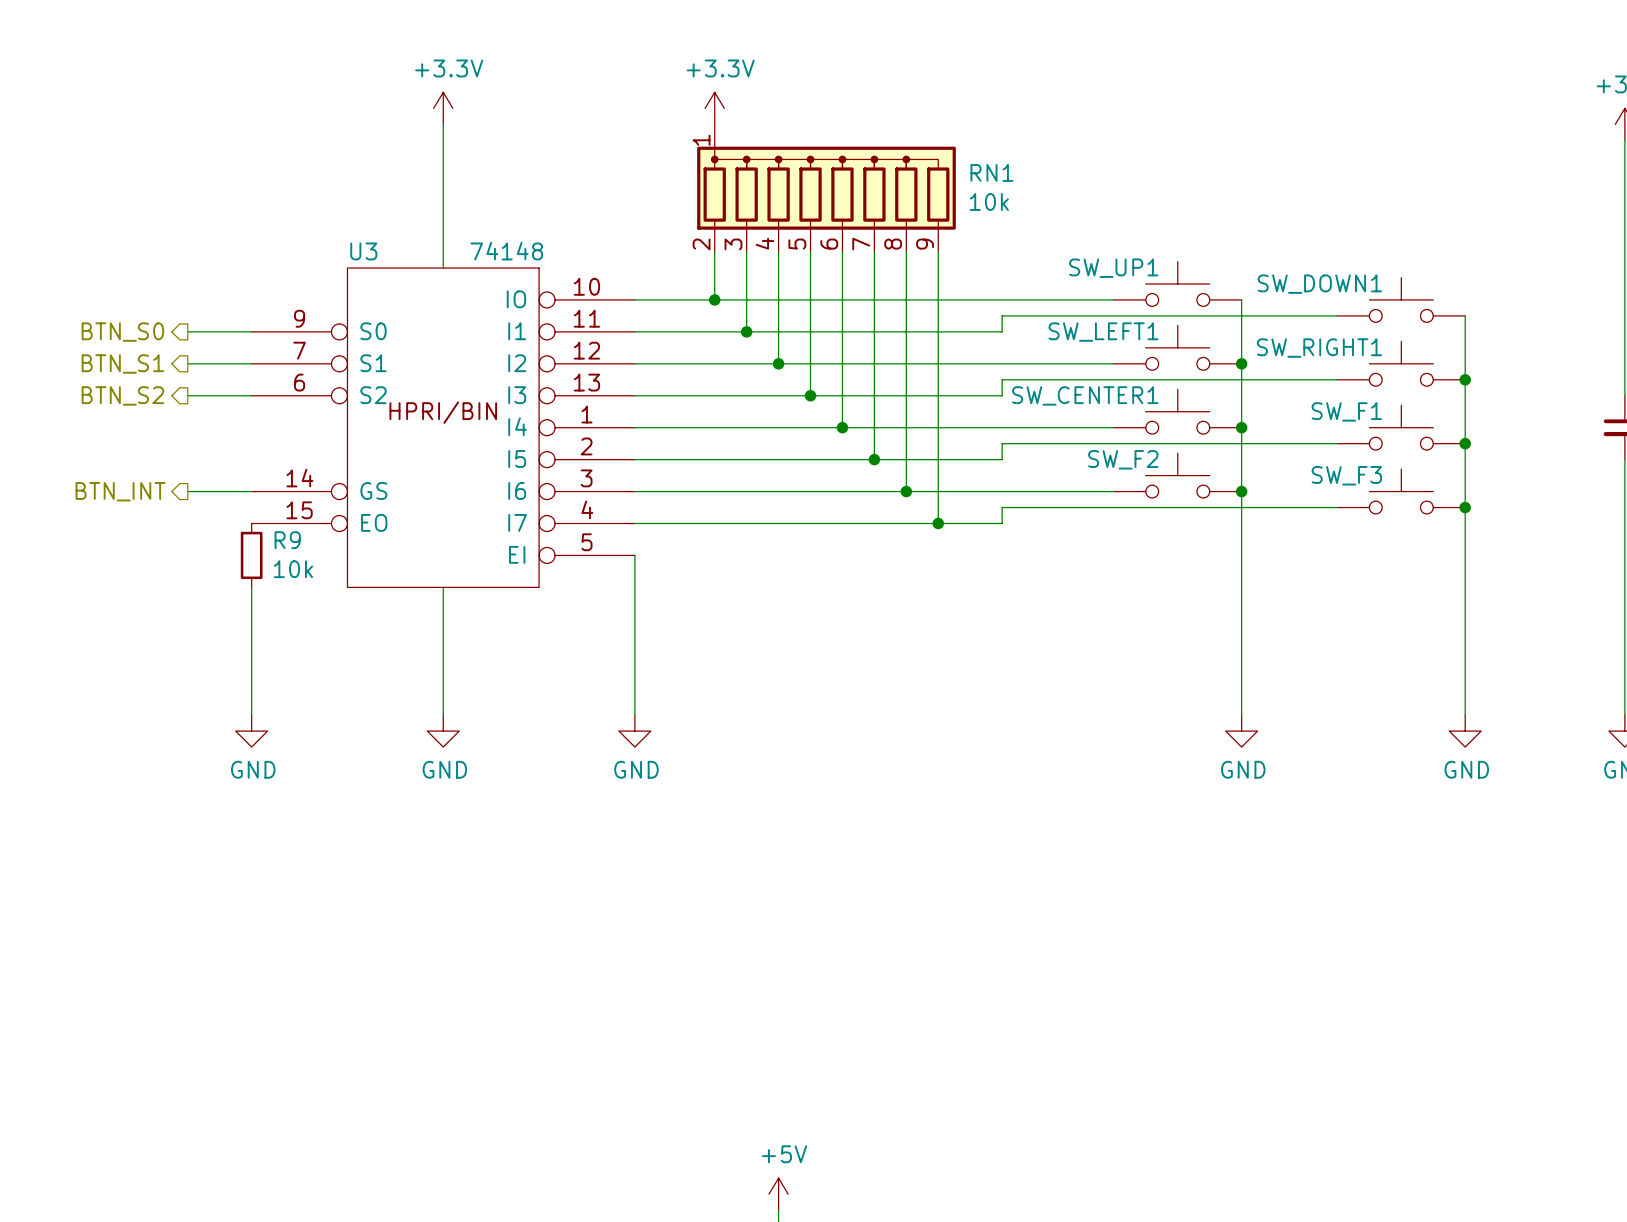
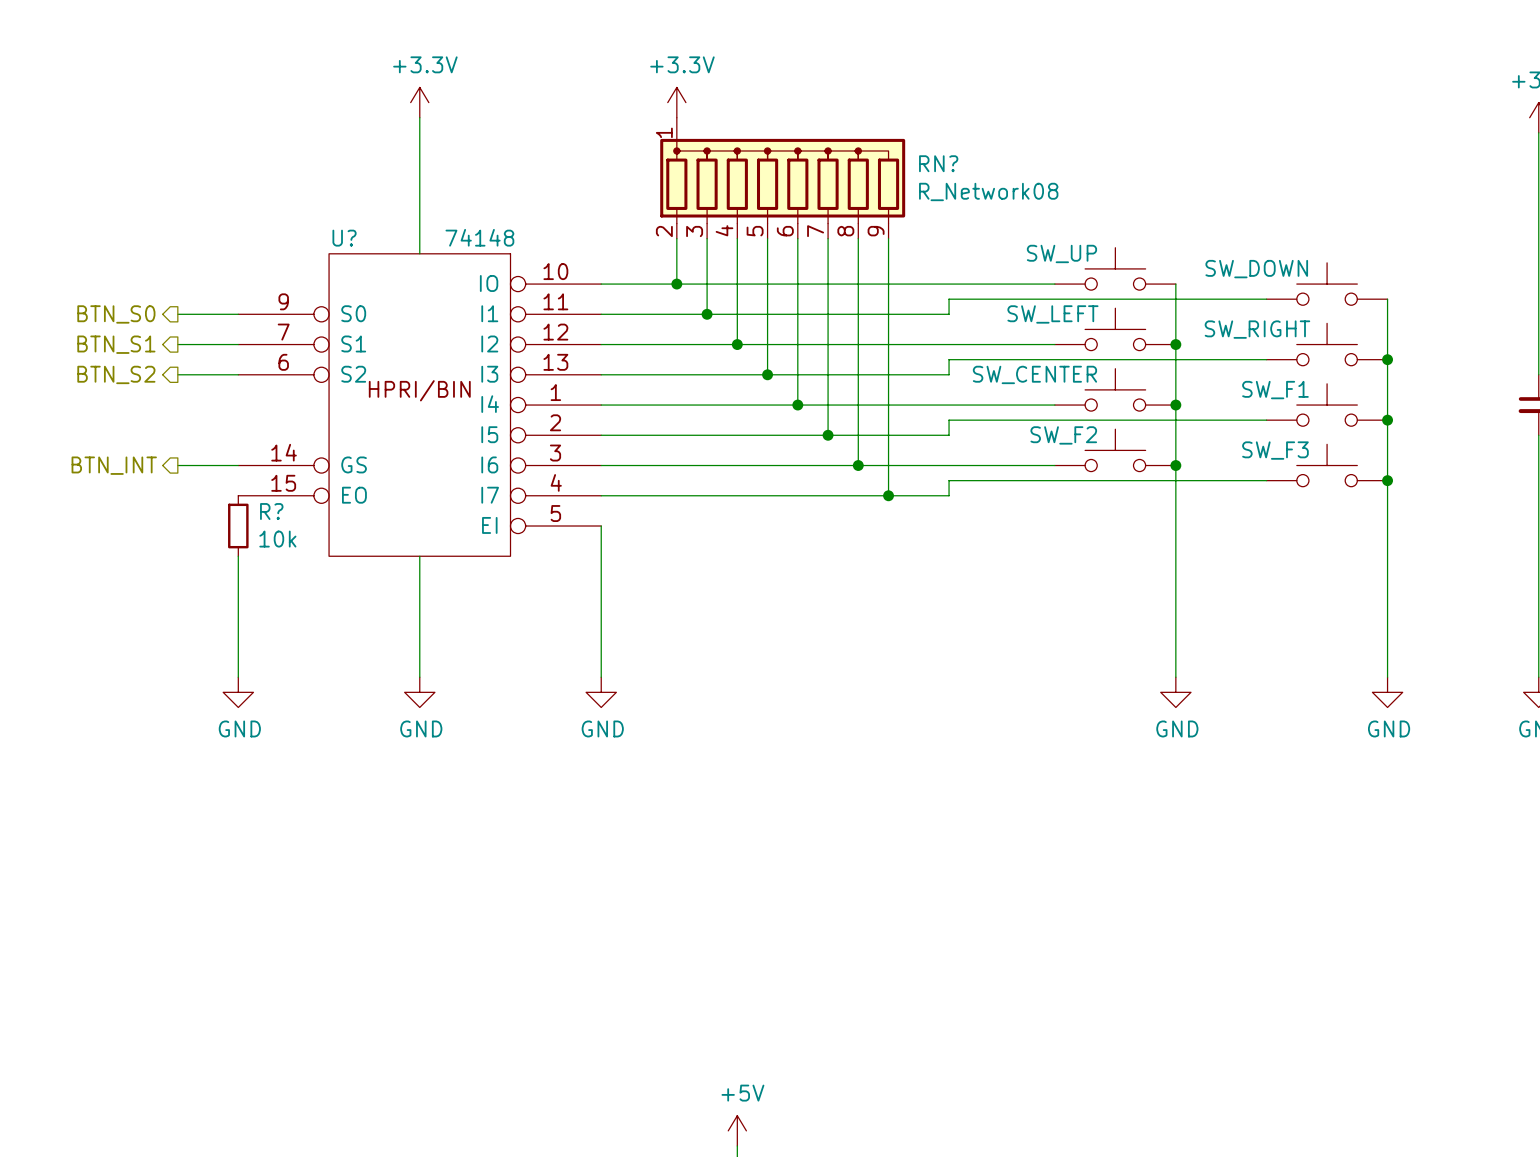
RN1 name: RN1 (991, 172) -> RN? (938, 163)
RN1 value: 10k (989, 201) -> R_Network08 (988, 191)
U3 name: U3 (363, 251) -> U? (344, 238)
SW_UP1 name: SW_UP1 (1113, 268) -> SW_UP (1061, 253)
SW_DOWN1 name: SW_DOWN1 (1319, 284) -> SW_DOWN (1256, 269)
SW_LEFT1 name: SW_LEFT1 (1103, 332) -> SW_LEFT (1052, 314)
SW_RIGHT1 name: SW_RIGHT1 (1319, 348) -> SW_RIGHT (1257, 329)
SW_CENTER1 name: SW_CENTER1 (1085, 395) -> SW_CENTER (1034, 374)
R9 name: R9 (287, 540) -> R? (271, 511)

